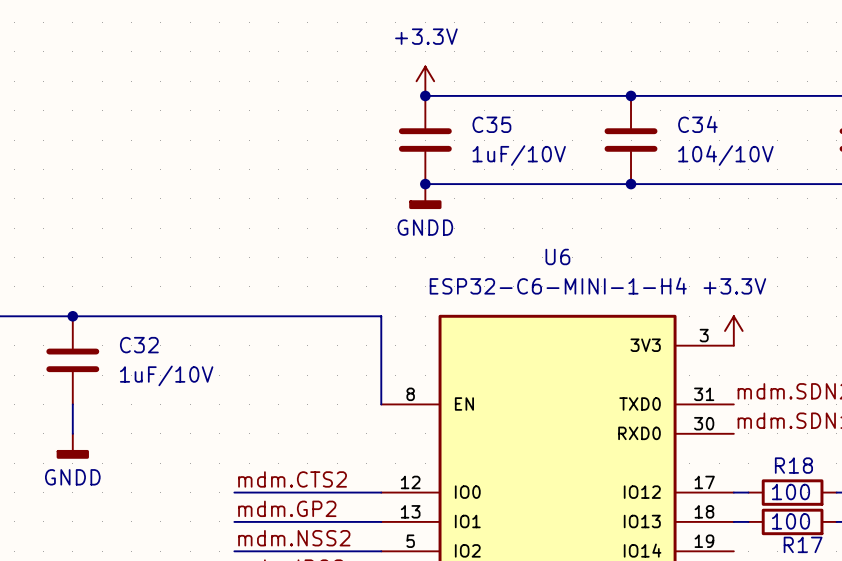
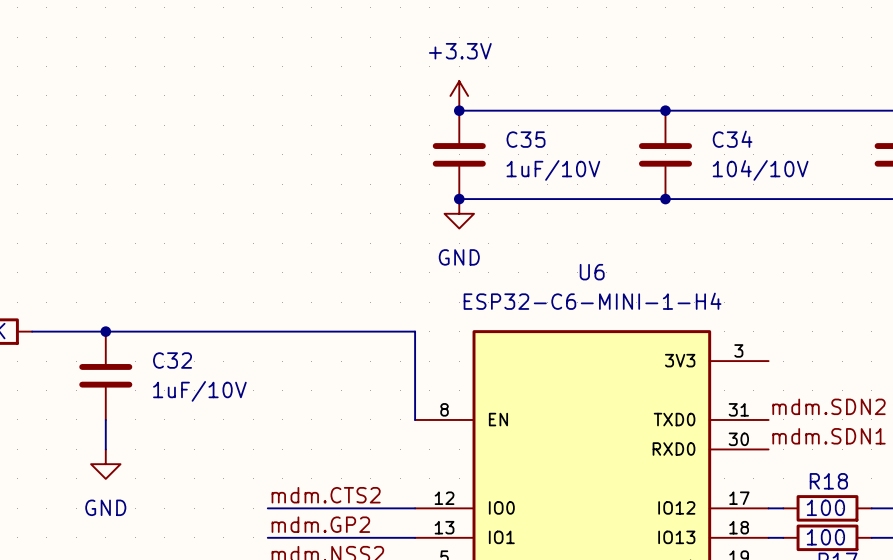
power symbol: GNDD (425, 196) -> GND (459, 213)
power symbol: +3.3V (733, 330) -> none
power symbol: GNDD (72, 446) -> GND (105, 464)

